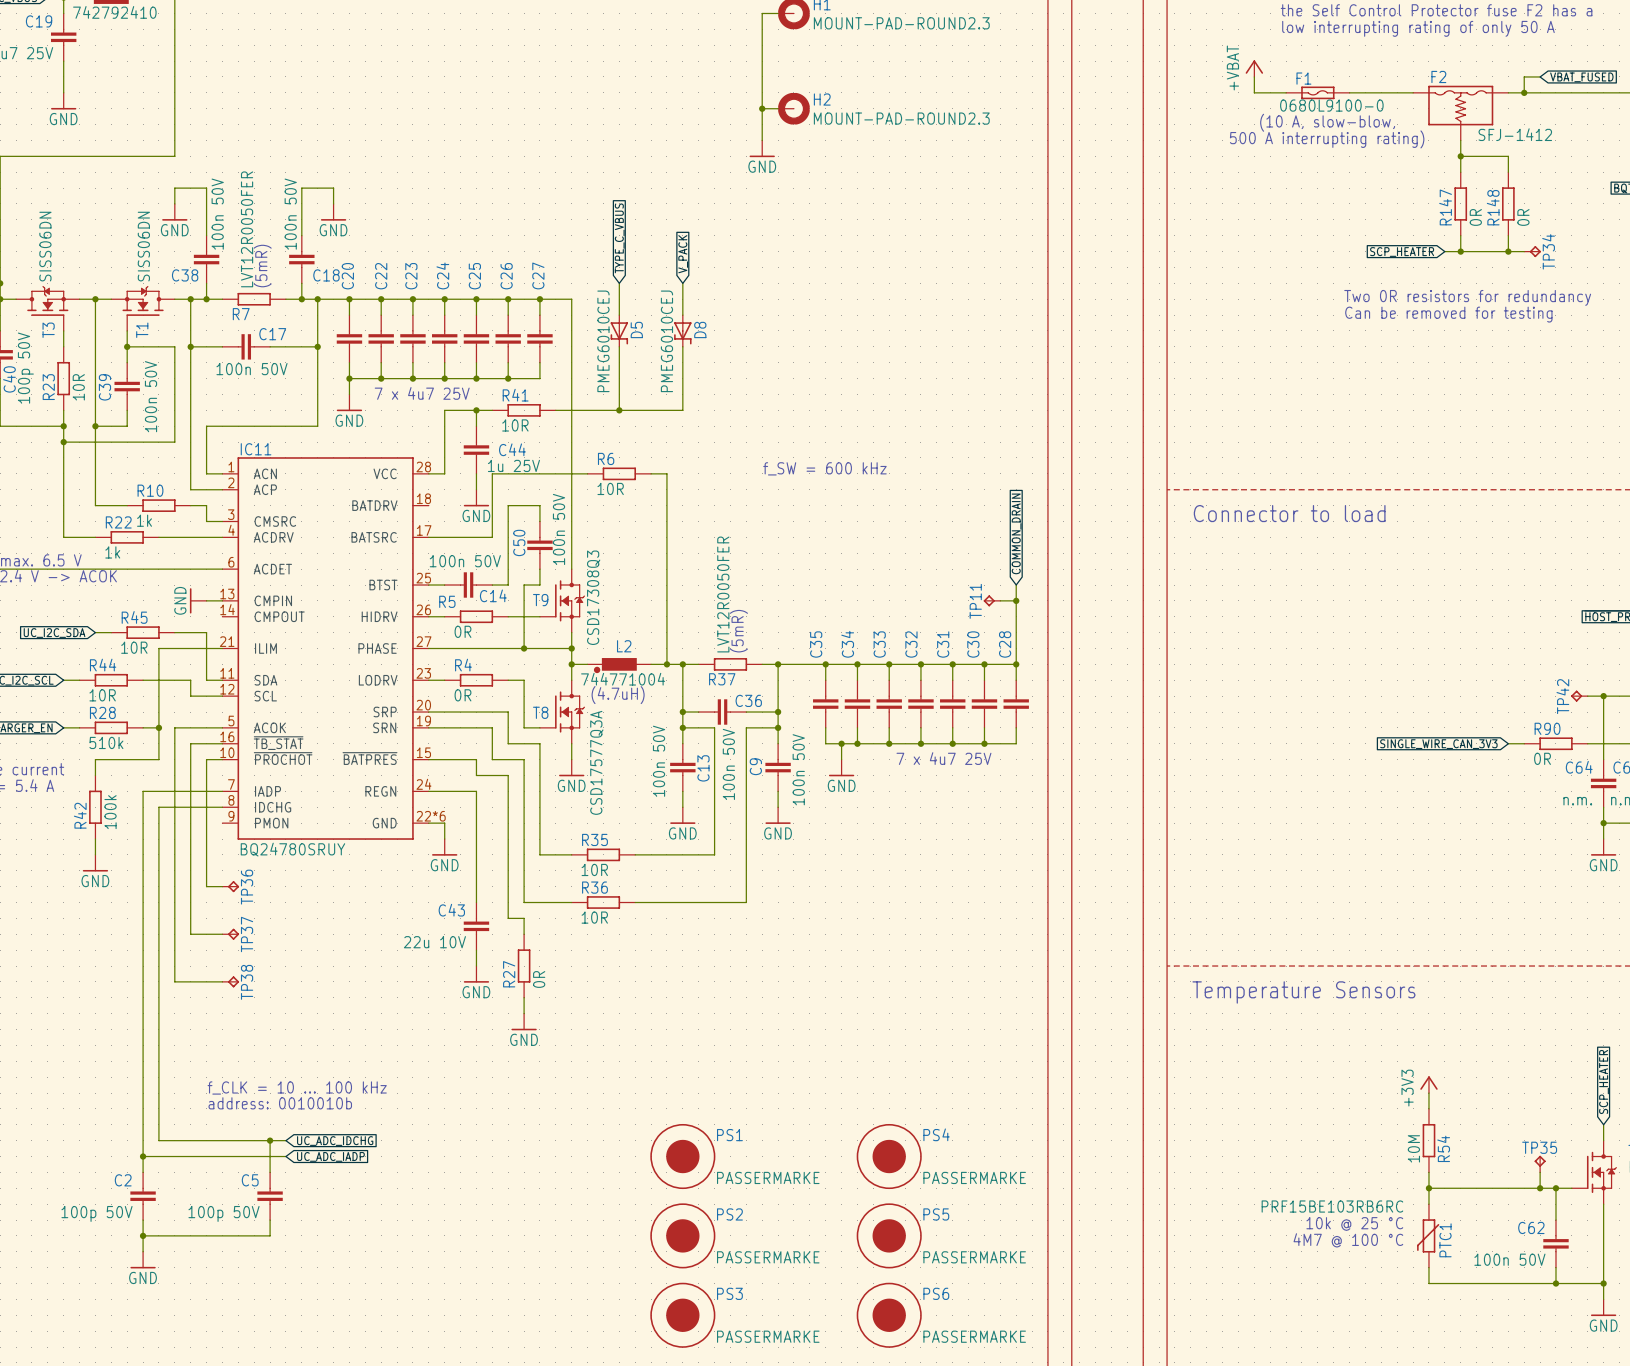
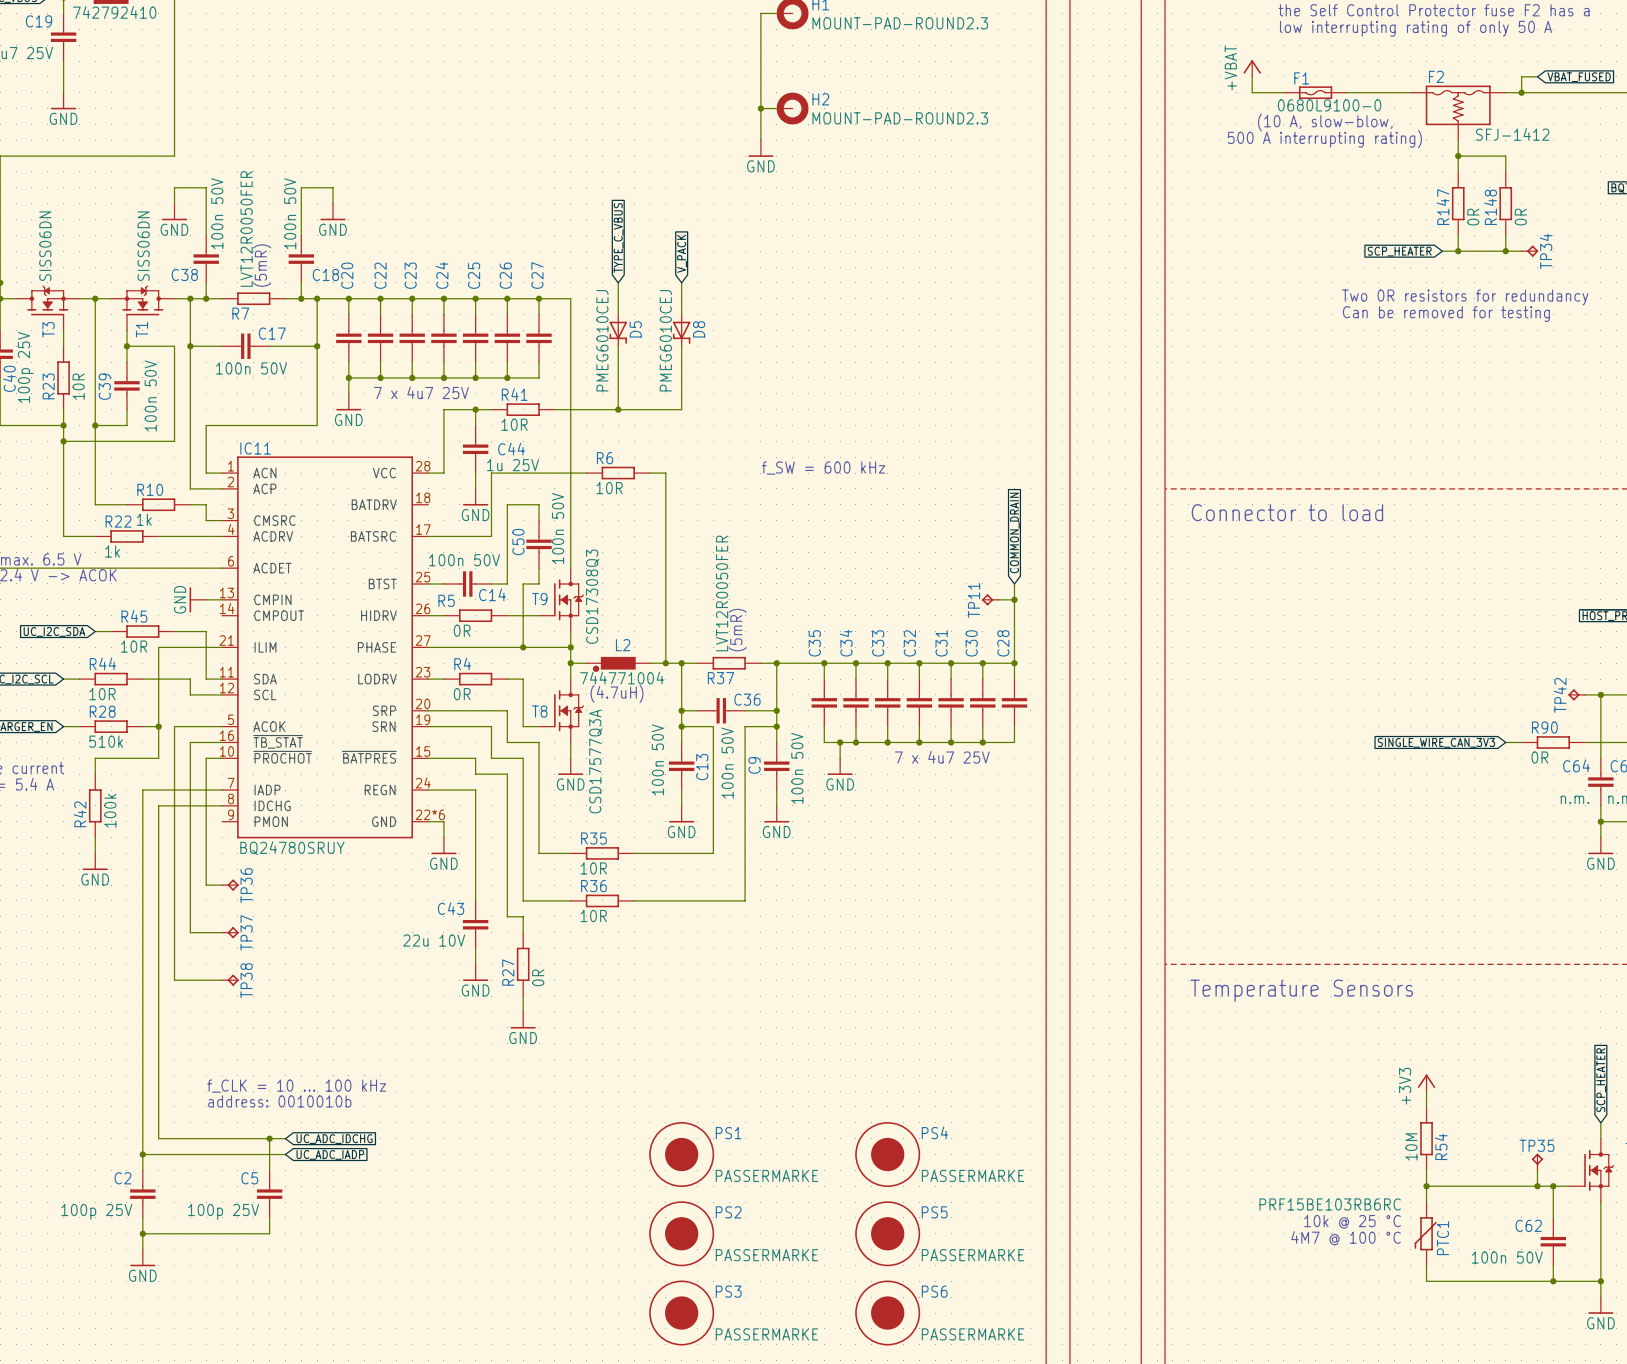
C40 value: 100p 50V (25, 368) -> 100p 25V (25, 367)
C2 value: 100p 50V (97, 1213) -> 100p 25V (96, 1211)
C5 value: 100p 50V (224, 1213) -> 100p 25V (223, 1211)

